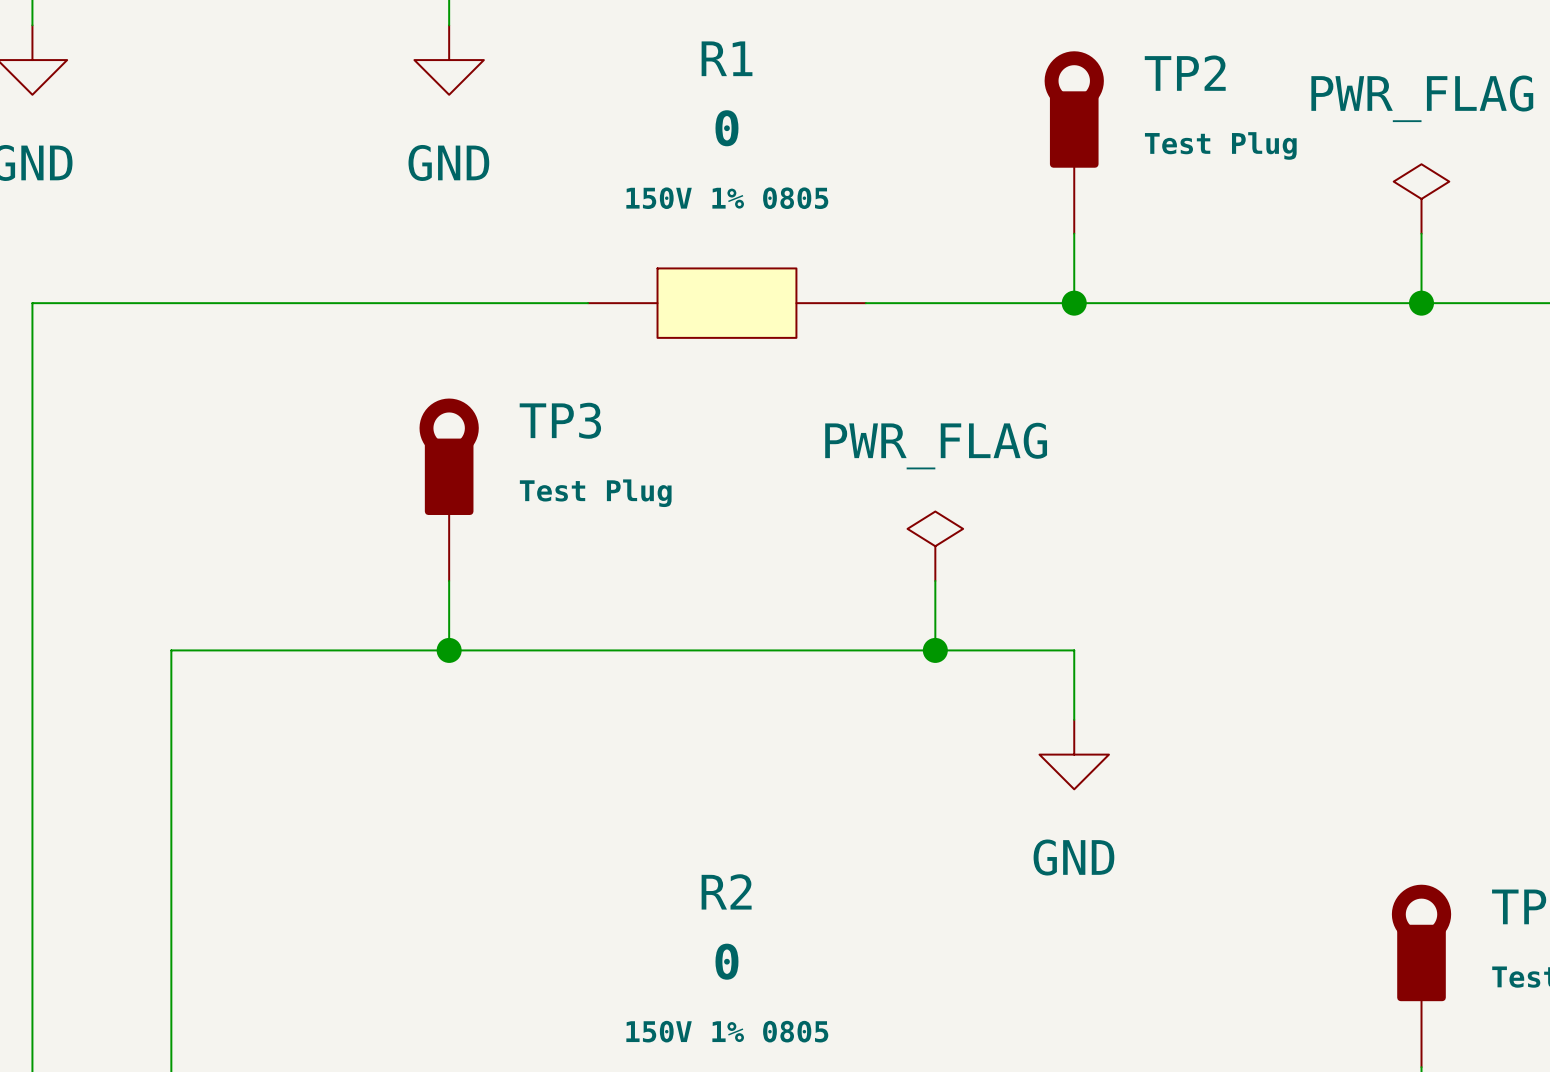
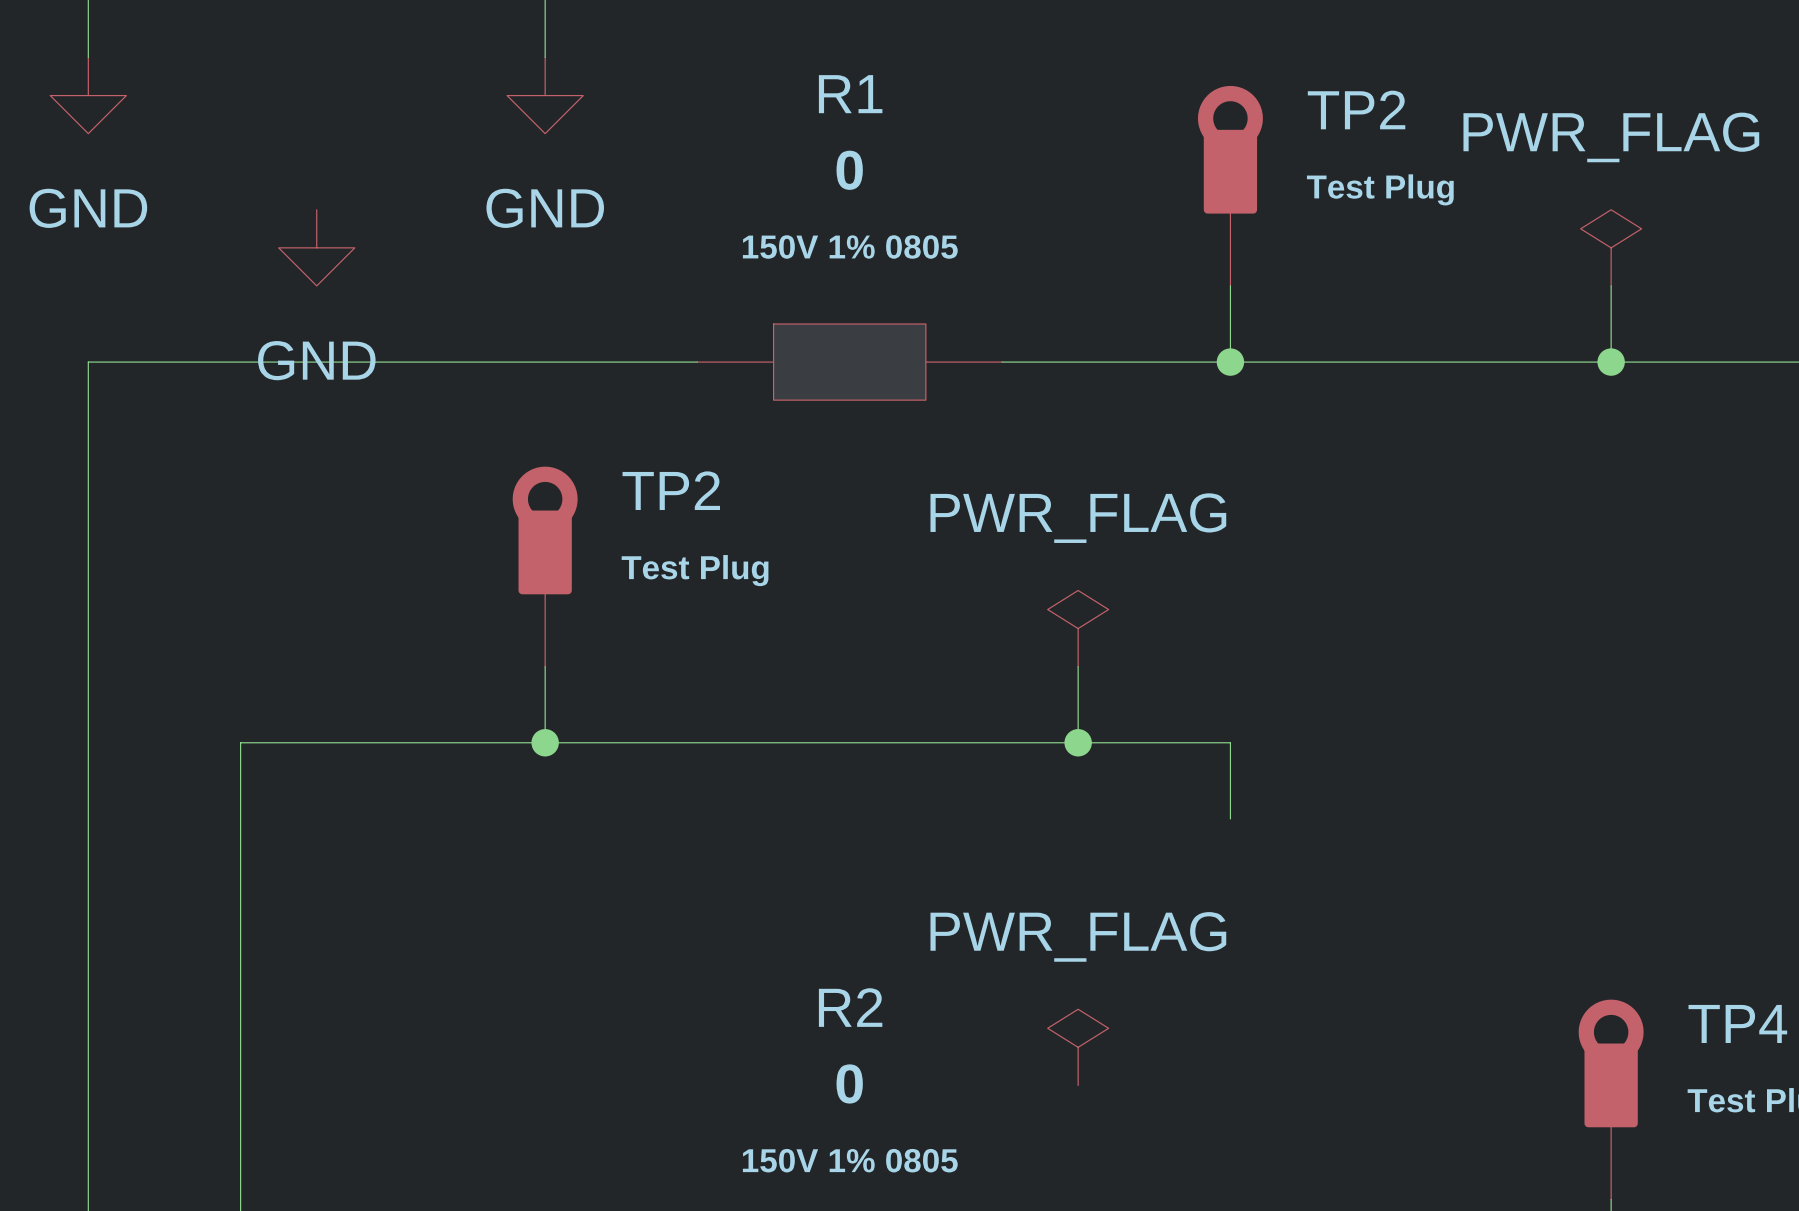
power symbol: none -> GND (316, 247)
TP3 name: TP3 (560, 420) -> TP2 (671, 490)
power symbol: GND (1074, 754) -> none
power symbol: none -> PWR_FLAG (1078, 1047)

